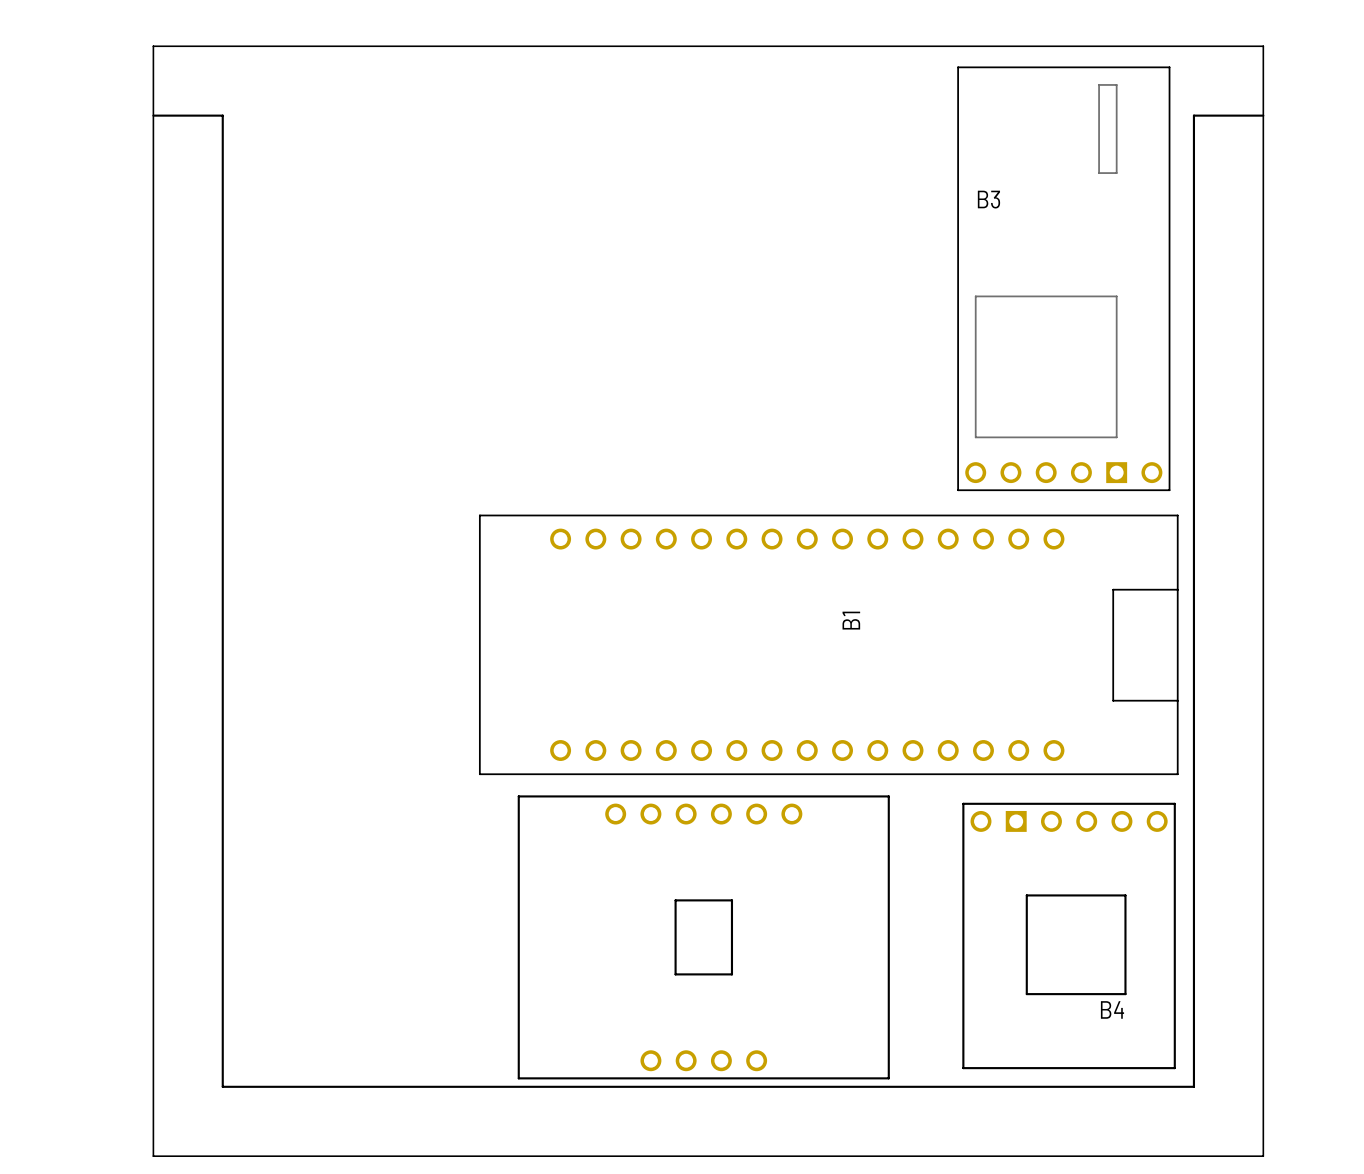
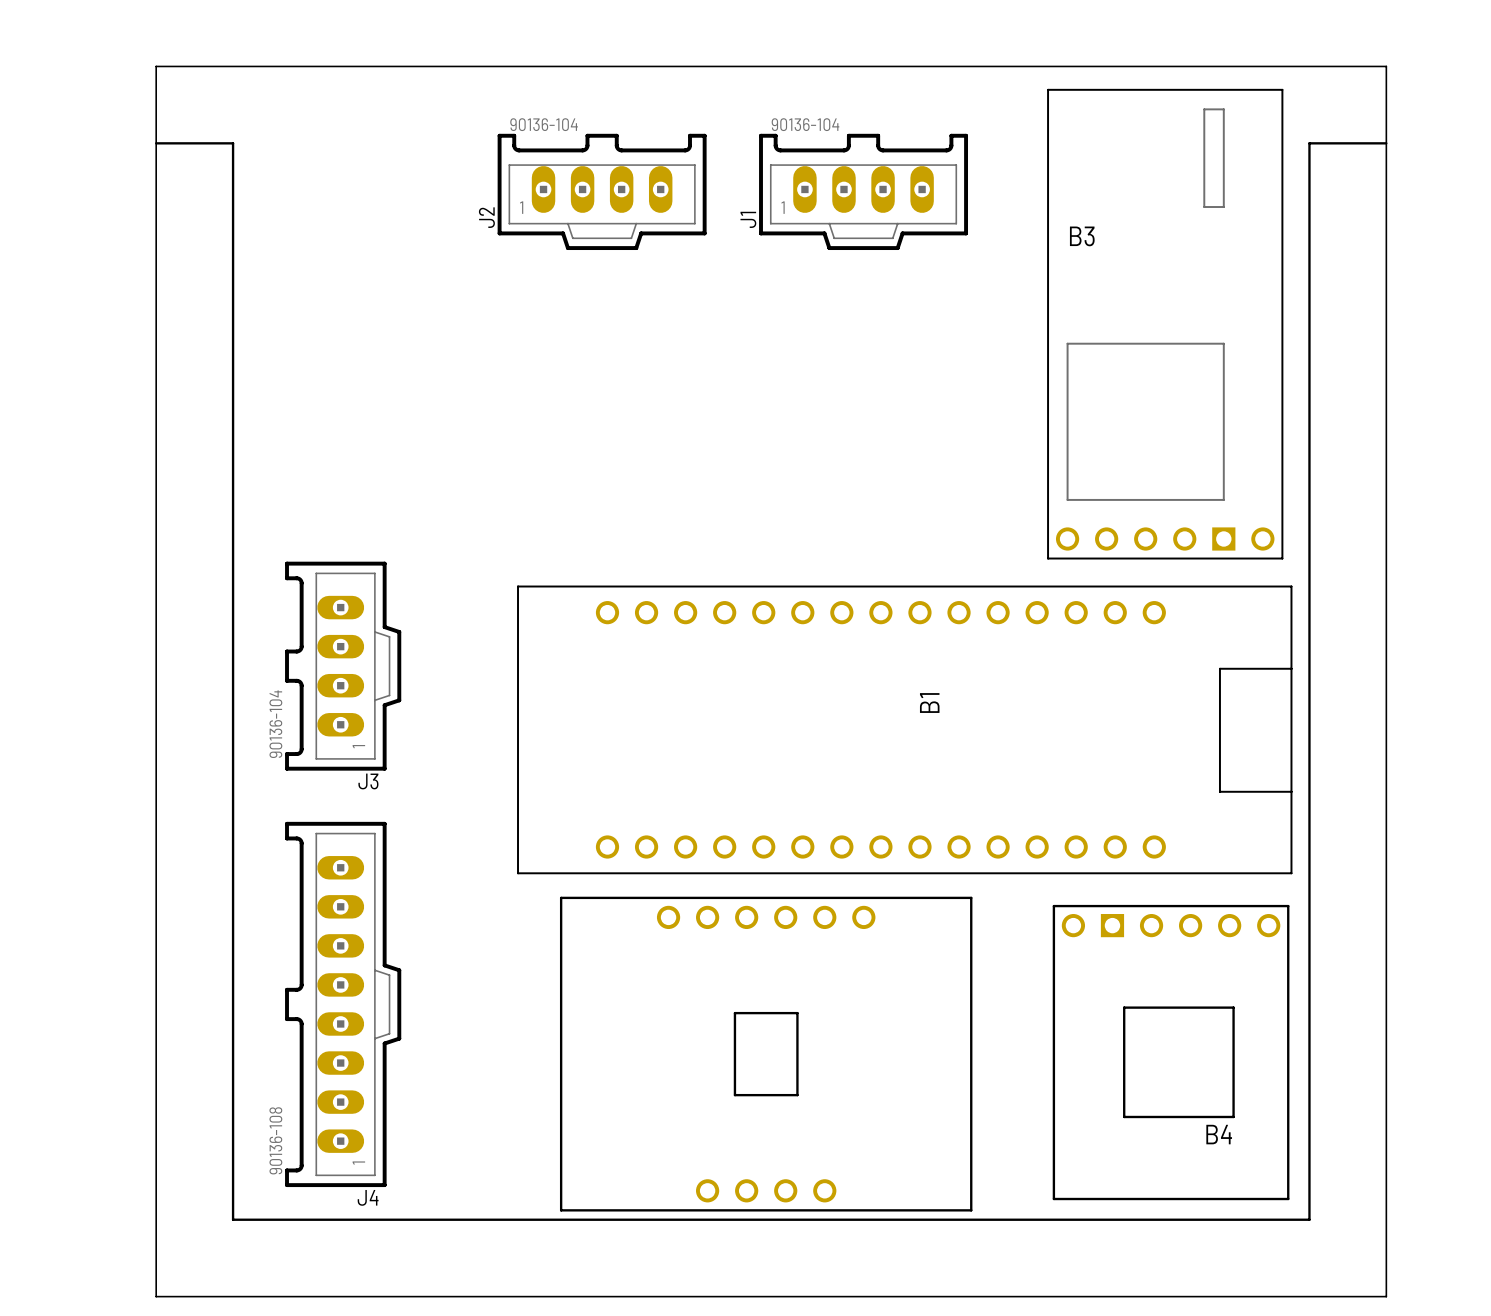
J2: none -> 90136-104 (602, 191)
J1: none -> 90136-104 (863, 191)
J3: none -> 90136-104 (343, 666)
J4: none -> 90136-108 (343, 1004)

